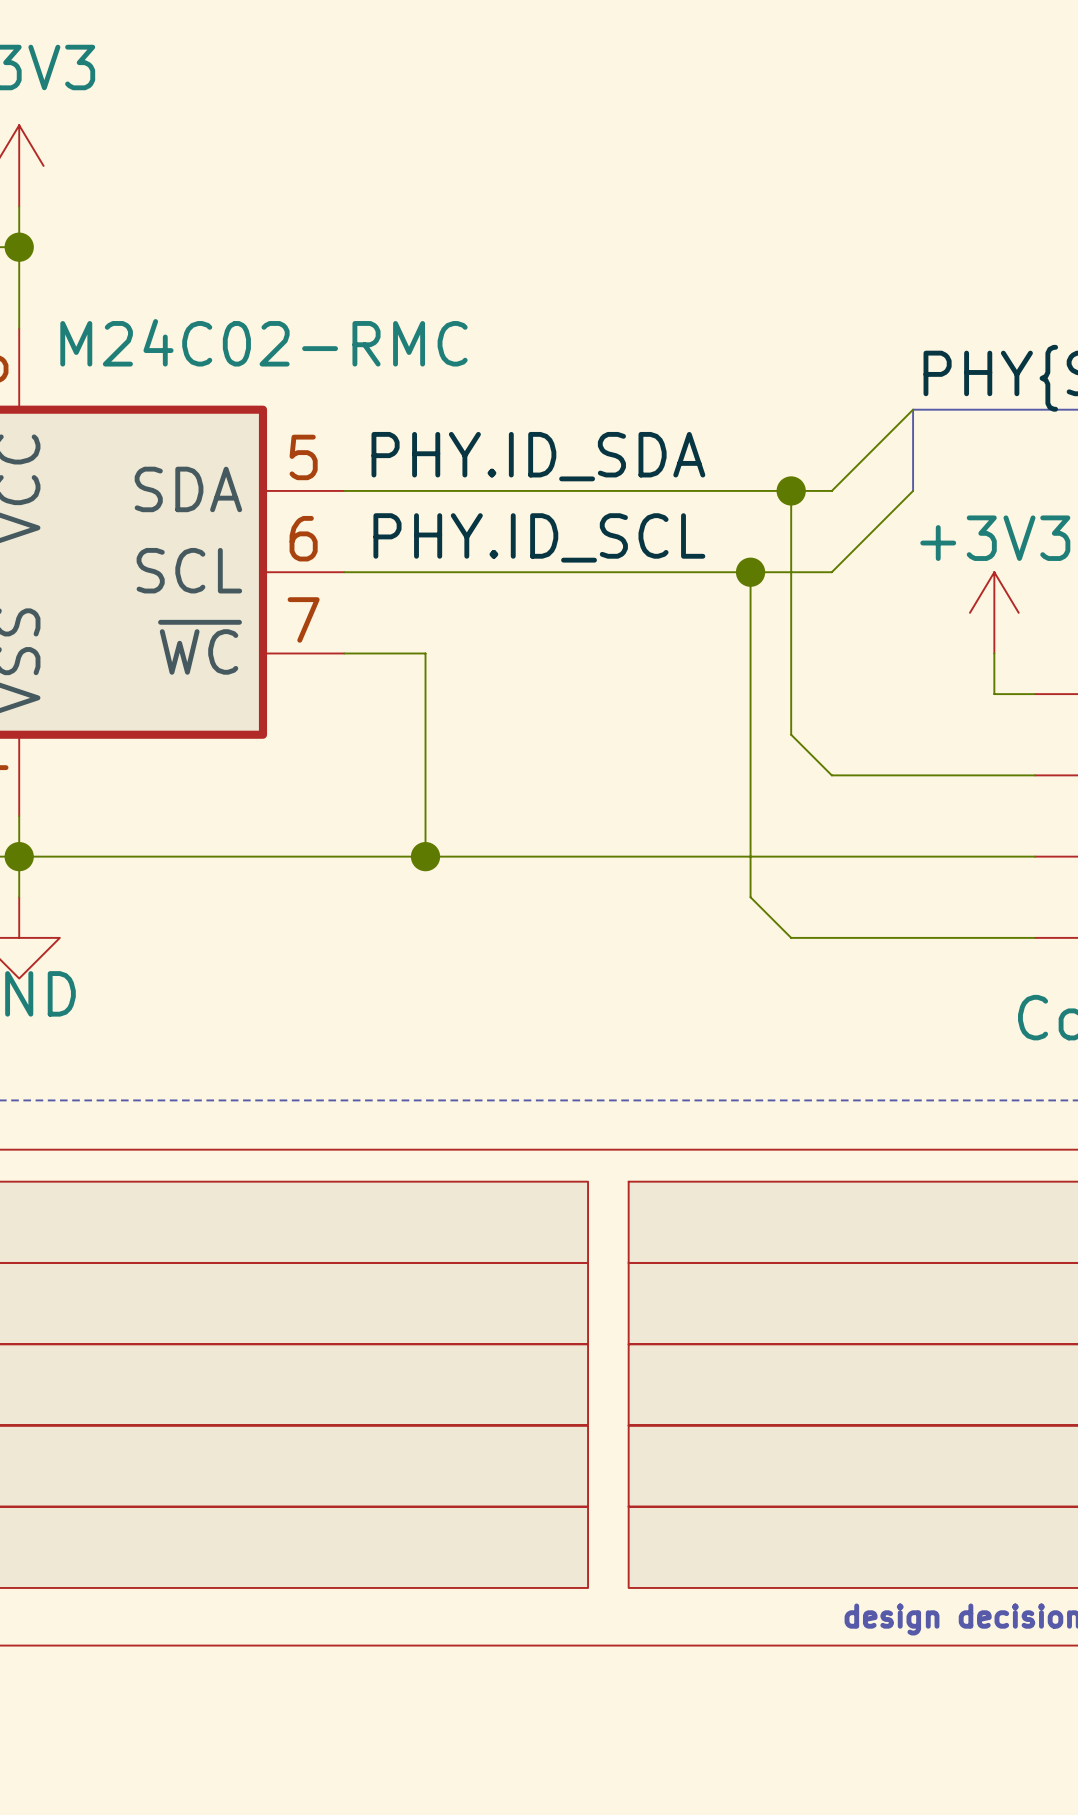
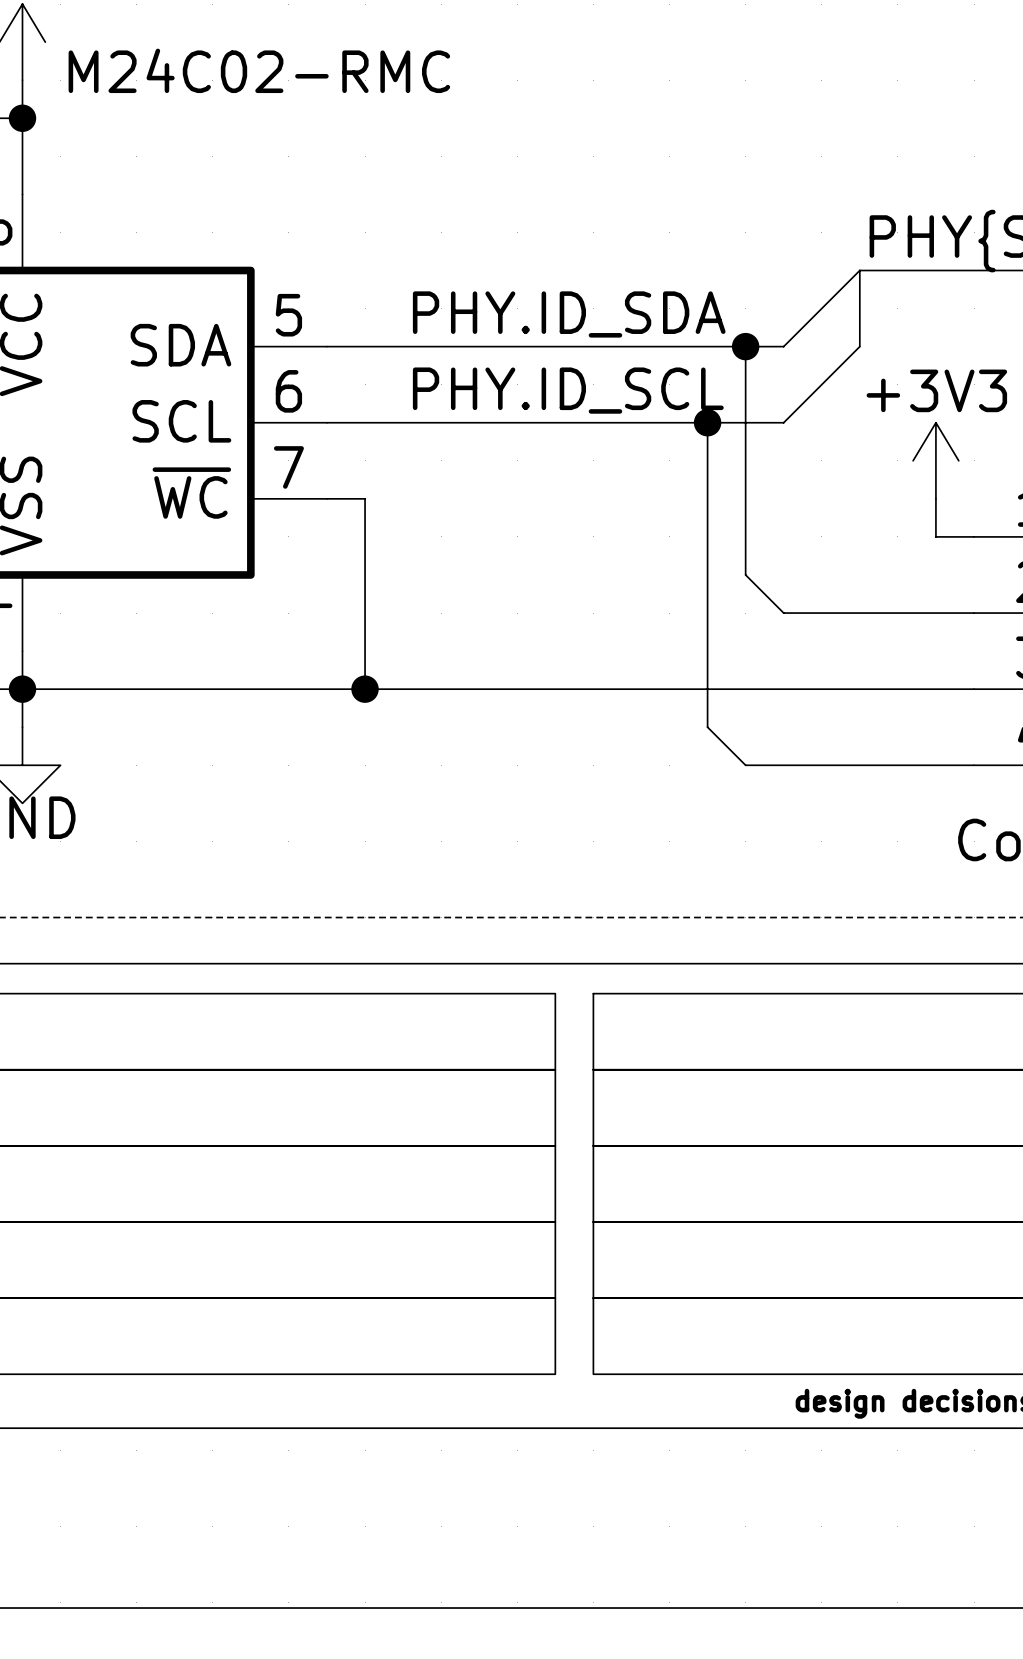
part value position: M24C02-RMC (263, 342) -> M24C02-RMC (259, 70)
label position: PHY.ID_SDA (538, 456) -> PHY.ID_SDA (569, 314)
label position: PHY.ID_SCL (539, 537) -> PHY.ID_SCL (568, 390)
wire: (384, 653) (425, 653) (425, 856) -> (365, 498) (365, 689)
junction position: (425, 856) -> (365, 689)

